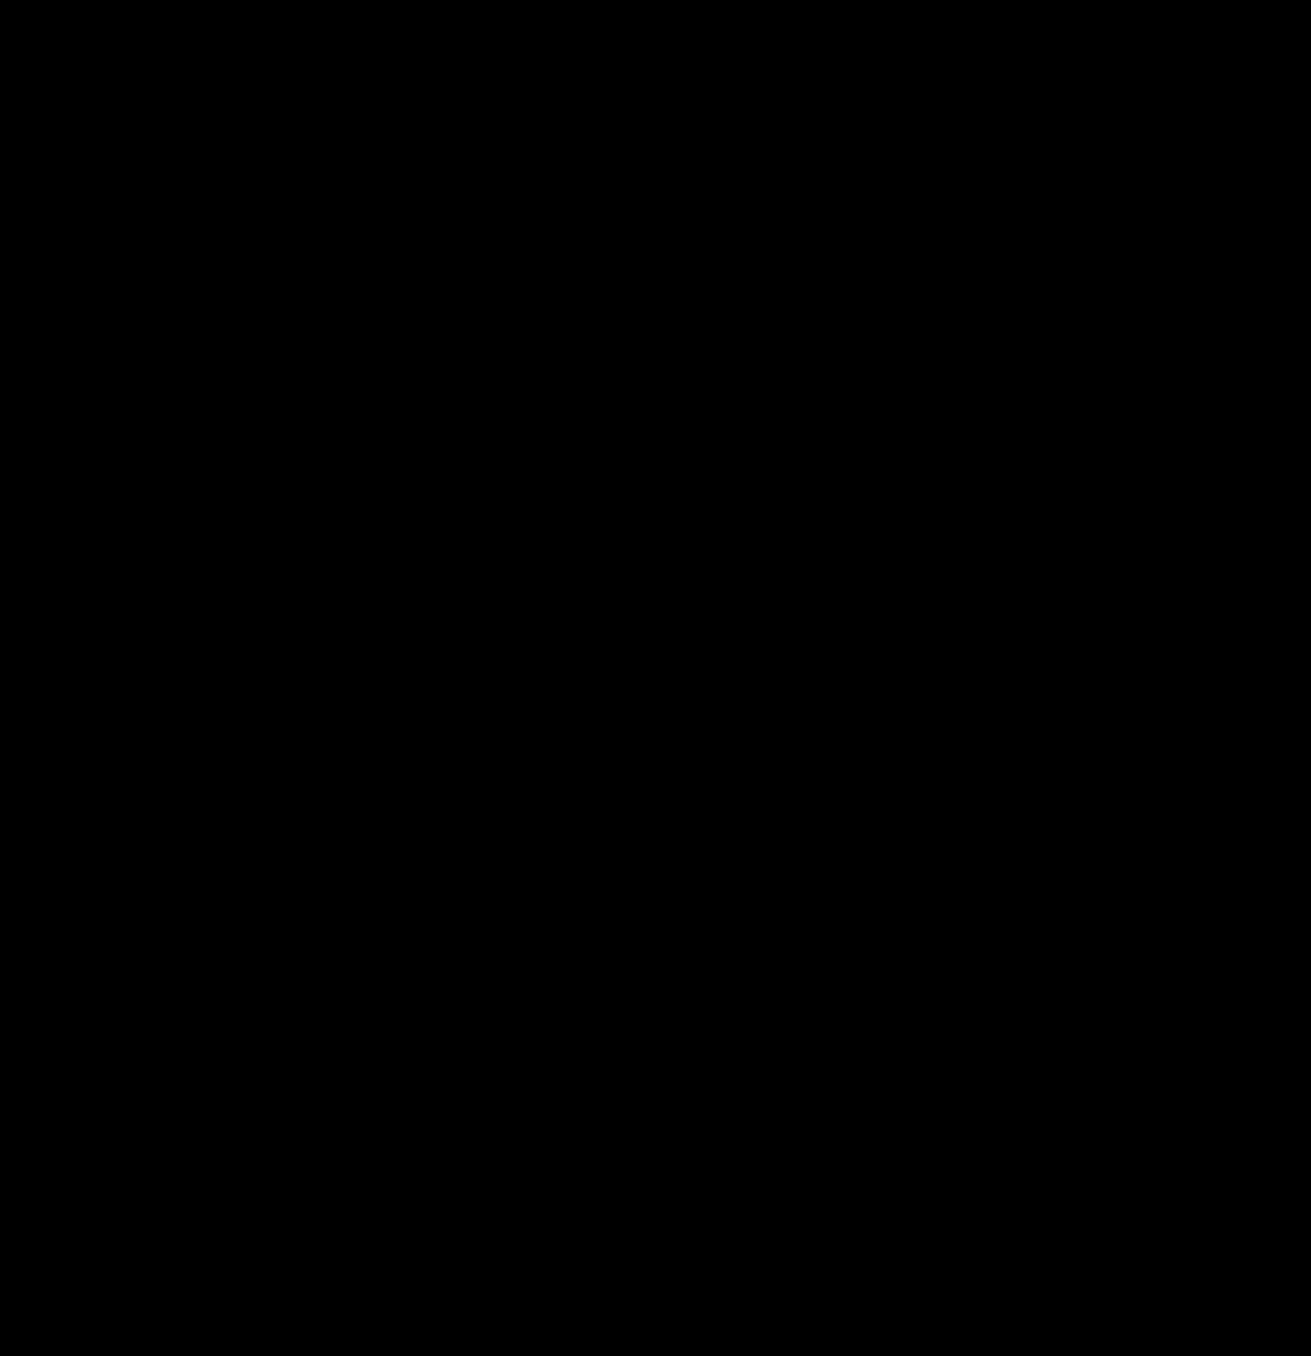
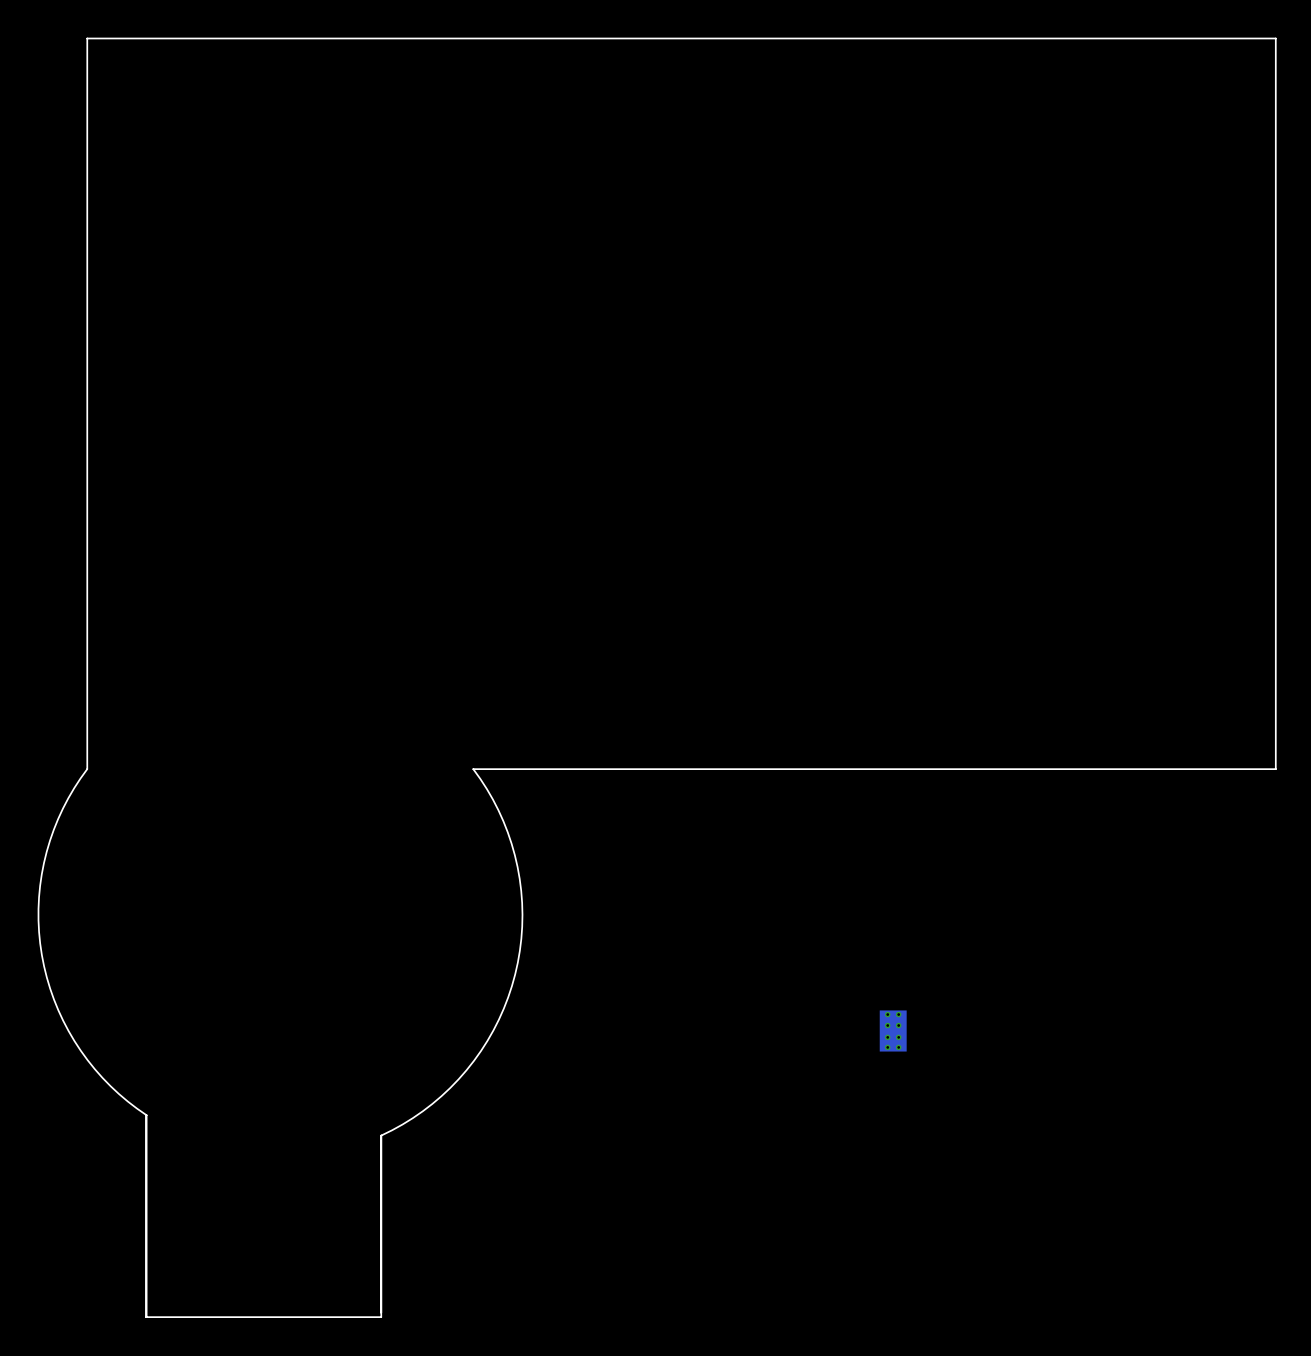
part: none -> (893, 1030)
board edge: none -> (146, 1115) (146, 1317) (381, 1317) (381, 1135) (402, 1124) (432, 1103) (450, 1087) (474, 1060) (493, 1030) (503, 1008) (515, 974) (519, 950) (522, 902) (514, 855) (498, 810) (473, 769) (1275, 769) (1275, 38) (87, 38) (87, 769) (68, 798) (50, 840) (40, 885) (39, 932) (44, 966) (50, 988) (58, 1010) (74, 1041) (94, 1069) (110, 1086) (146, 1115)

